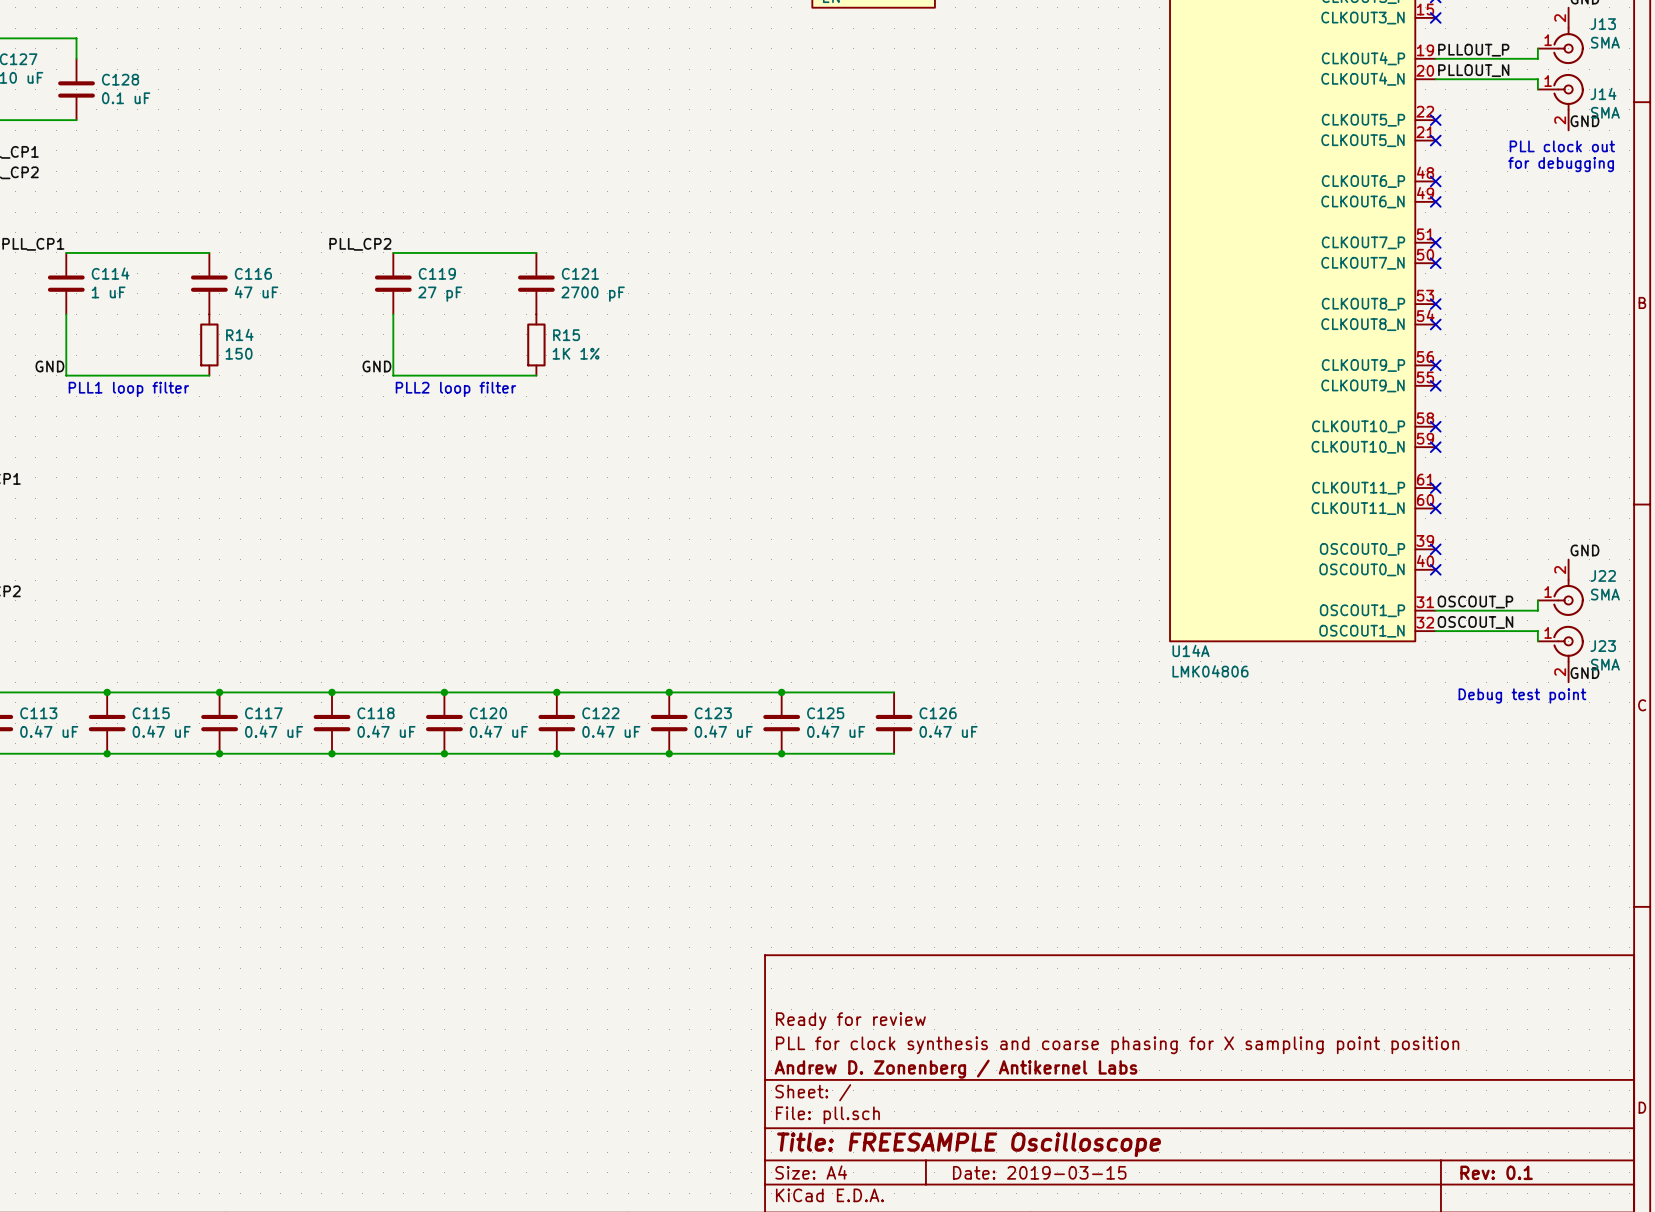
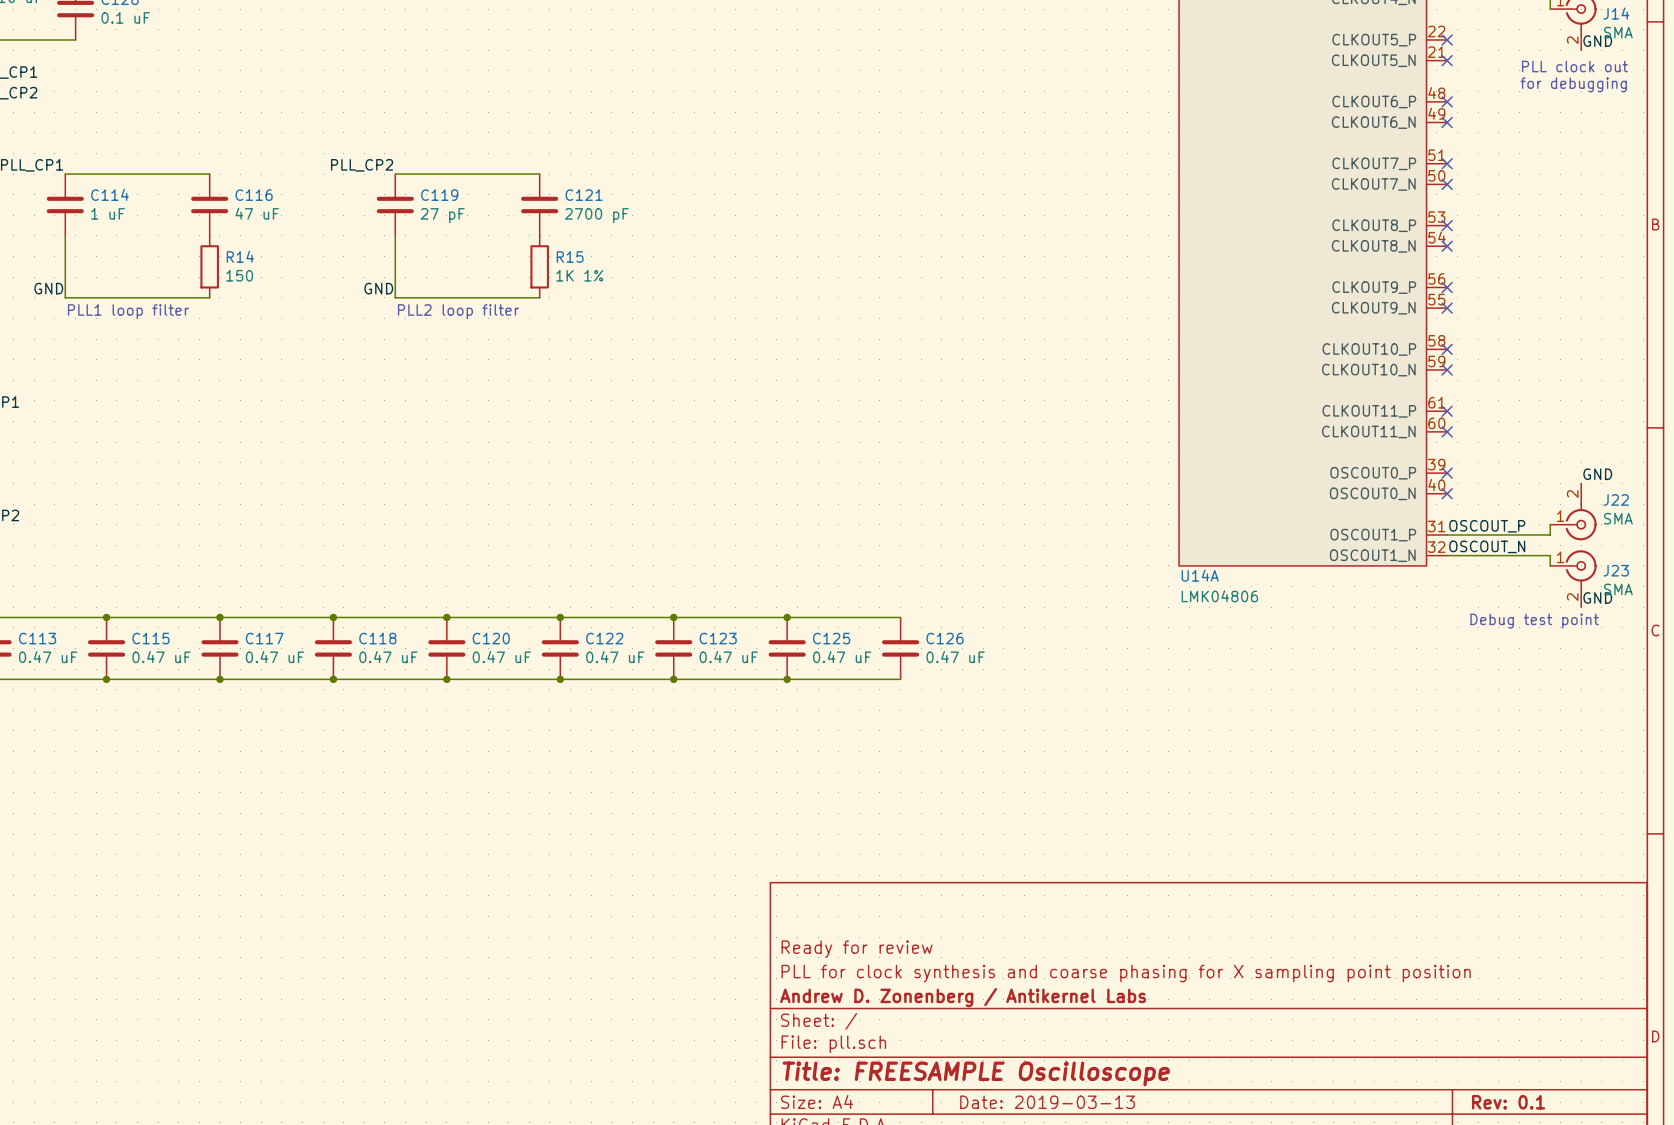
title block: Date: 2019-03-15 (1039, 1172) -> Date: 2019-03-13 (1047, 1102)

